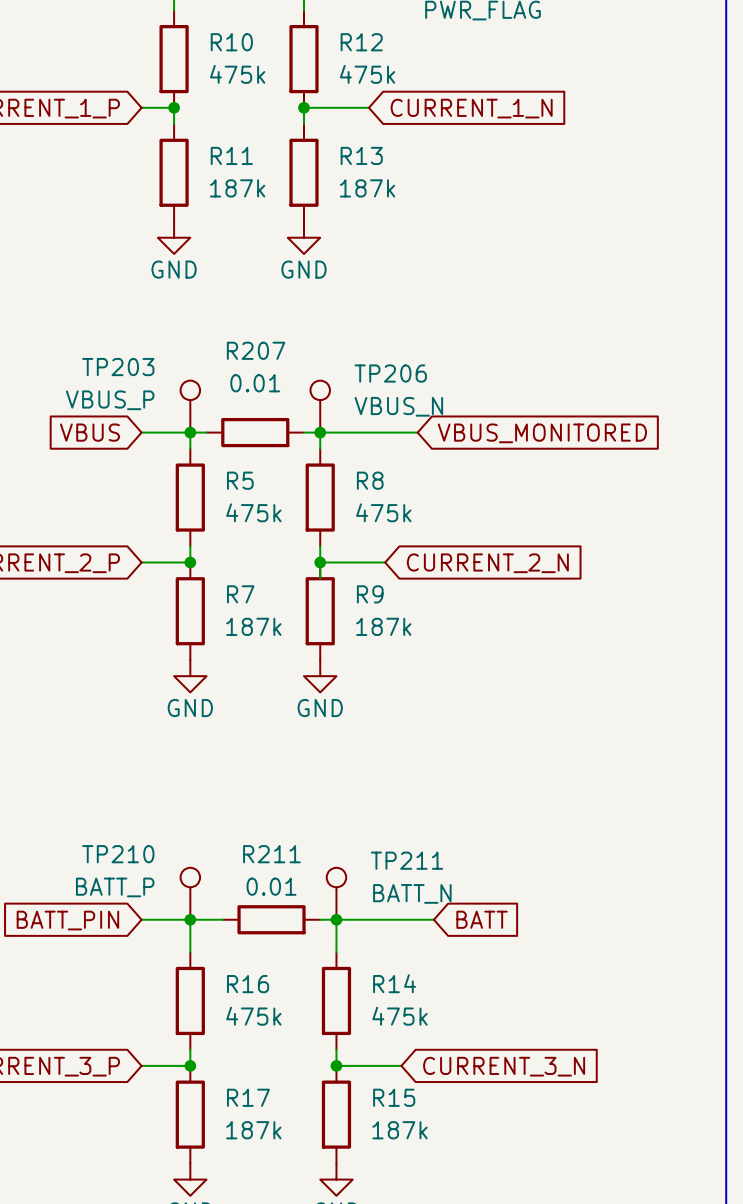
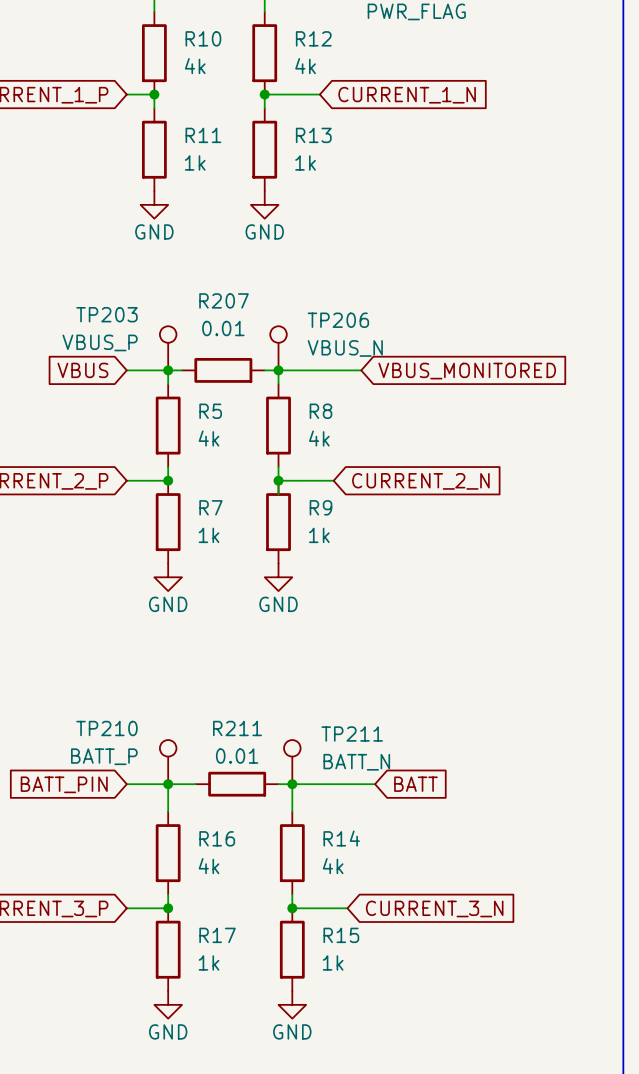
R10 value: 475k (237, 74) -> 4k (195, 66)
R12 value: 475k (367, 74) -> 4k (305, 66)
R11 value: 187k (237, 188) -> 1k (195, 162)
R13 value: 187k (367, 188) -> 1k (305, 162)
R5 value: 475k (253, 512) -> 4k (209, 438)
R8 value: 475k (383, 512) -> 4k (319, 438)
R7 value: 187k (253, 626) -> 1k (209, 535)
R9 value: 187k (383, 626) -> 1k (319, 535)
R16 value: 475k (253, 1016) -> 4k (209, 866)
R14 value: 475k (400, 1016) -> 4k (333, 866)
R17 value: 187k (253, 1130) -> 1k (209, 962)
R15 value: 187k (400, 1130) -> 1k (333, 962)

